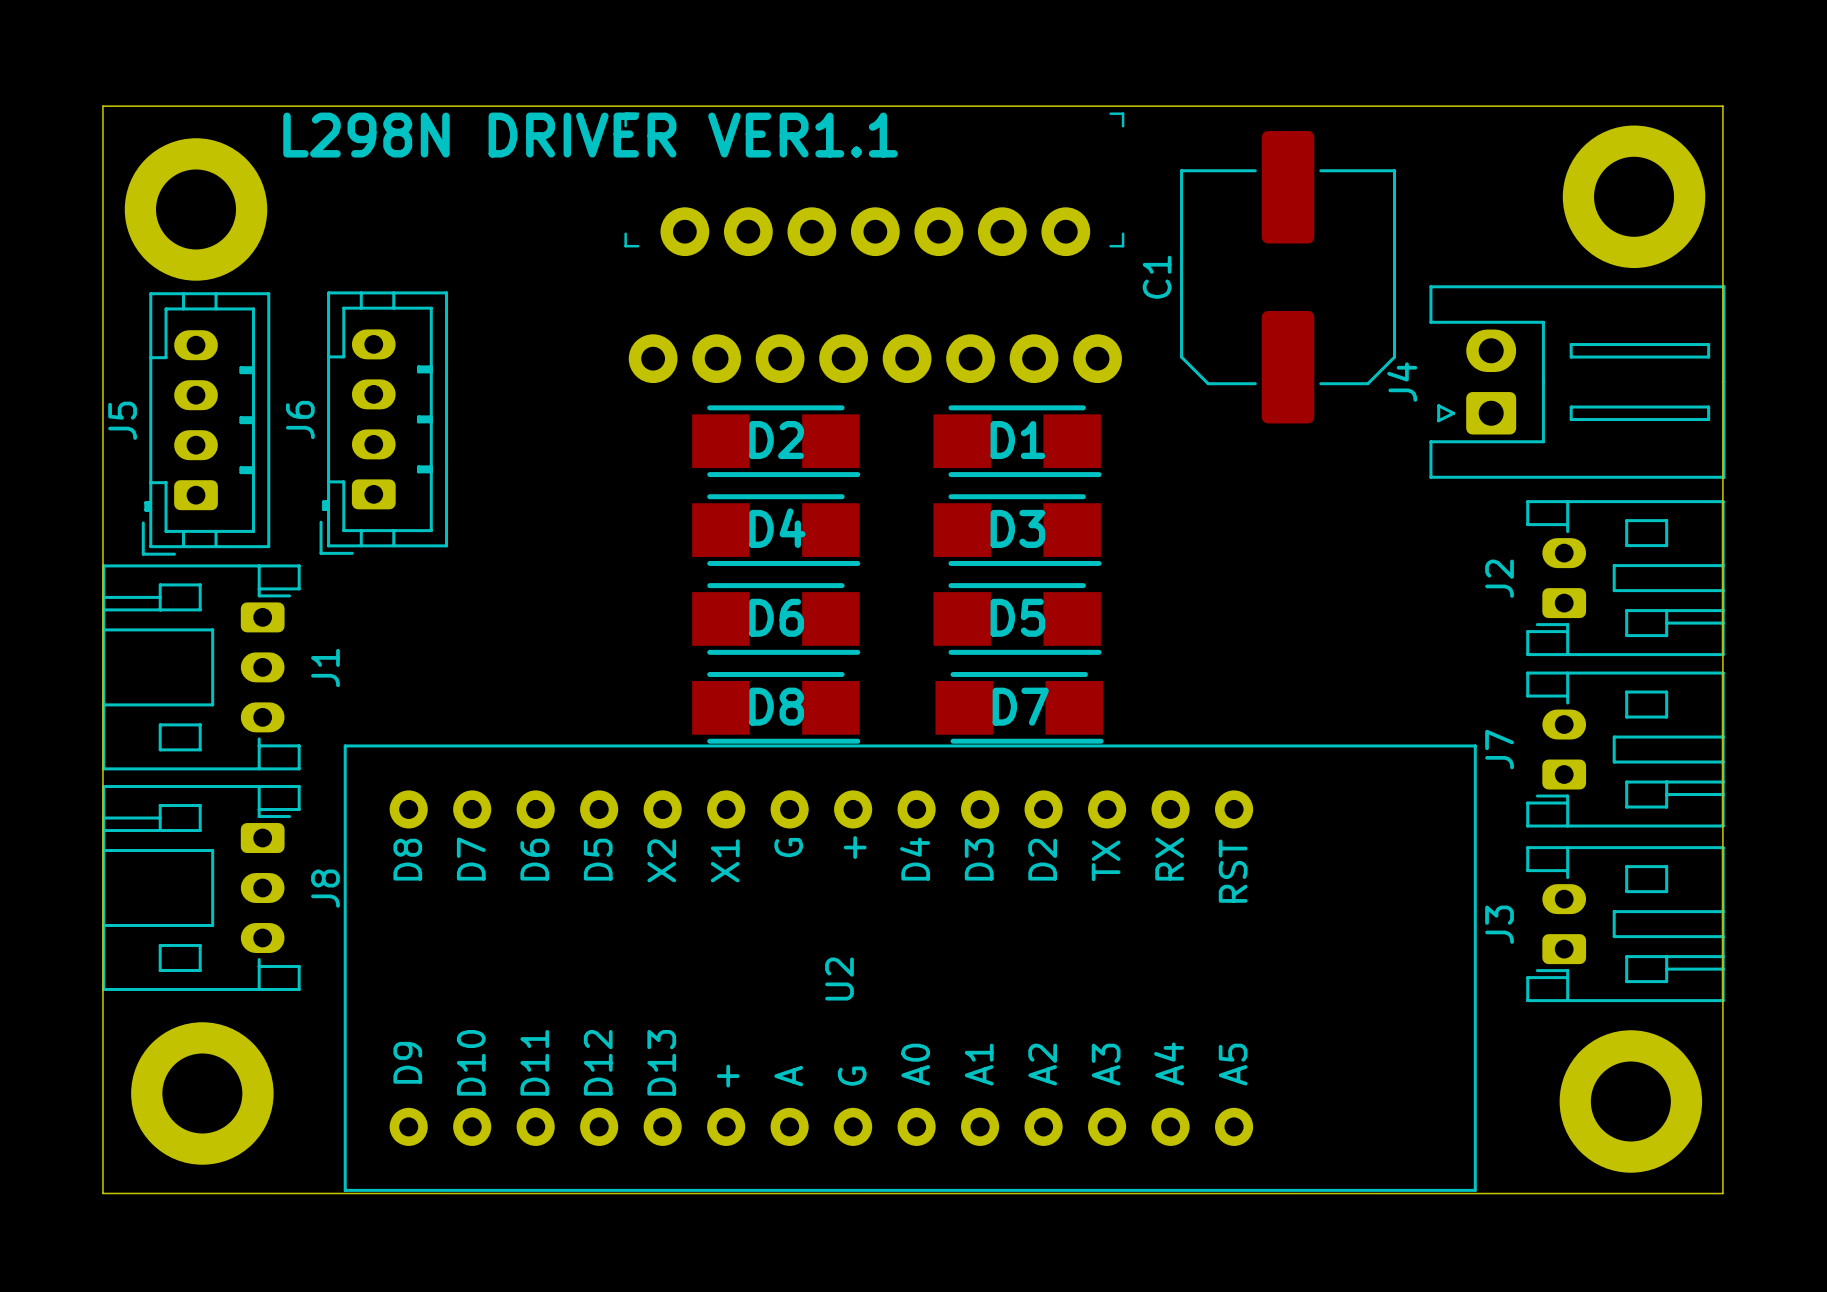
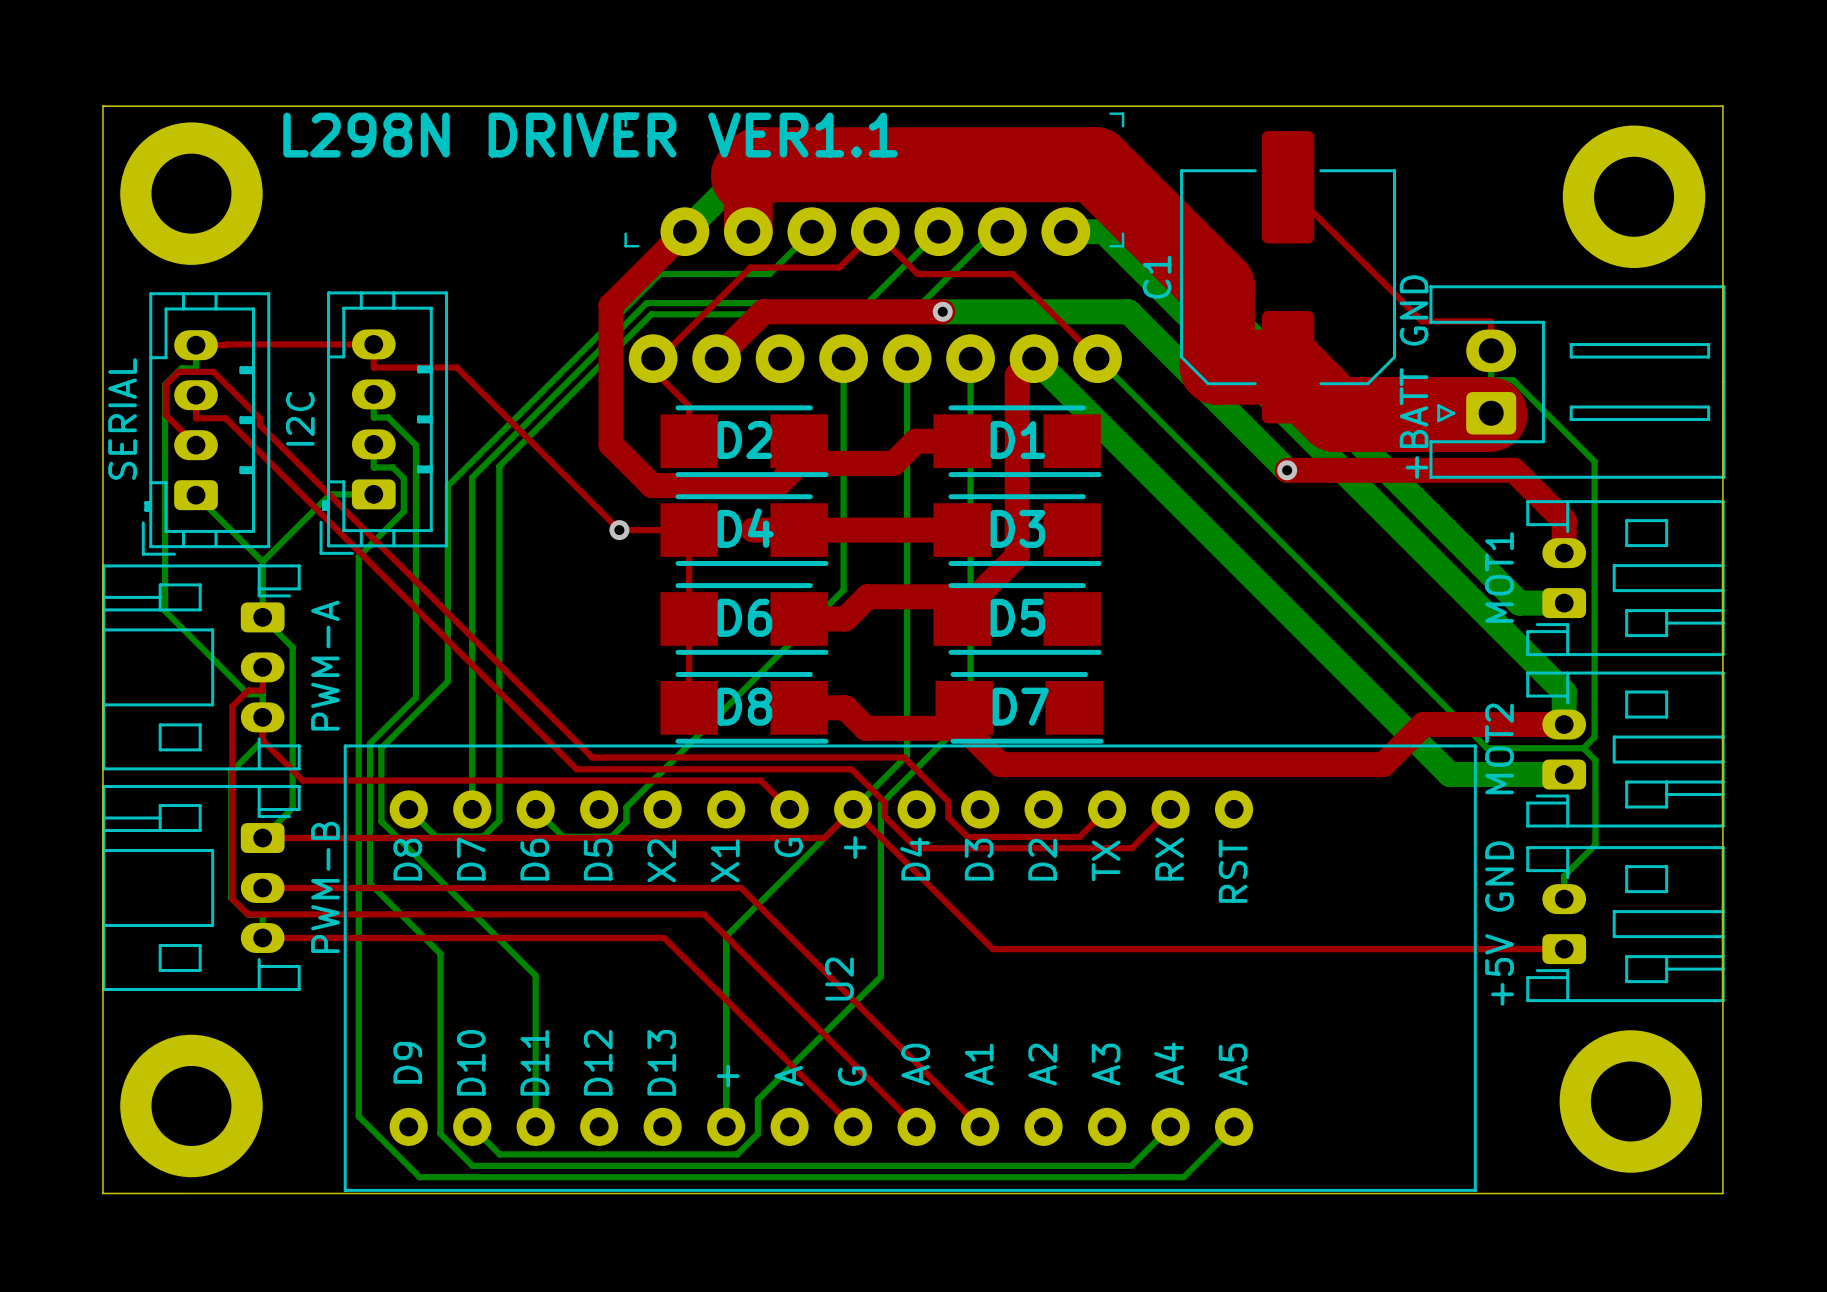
top track: none -> (1288, 187) (1422, 321) (1491, 321) (1491, 350)
part position: (196, 209) -> (191, 193)
top track: none -> (684, 231) (611, 305) (611, 444) (652, 485) (776, 485) (799, 463)
bottom track: none -> (684, 231) (727, 189) (1105, 189) (1519, 603) (1564, 603)
top track: none -> (748, 231) (748, 175) (759, 164) (1095, 164) (1217, 286) (1217, 367) (1288, 367) (1335, 414) (1491, 413)
bottom track: none -> (811, 231) (769, 274) (659, 274) (447, 486) (447, 681) (381, 748) (381, 821) (535, 975) (535, 1126)
bottom track: none -> (938, 231) (867, 303) (646, 303) (472, 477) (472, 809)
bottom track: none -> (1002, 231) (993, 231) (911, 314) (651, 314) (499, 466) (499, 820) (483, 836) (435, 836) (408, 809)
bottom track: none -> (1065, 231) (1103, 231) (1564, 692) (1564, 724)
top track: none -> (942, 311) (763, 311) (716, 358)
bottom track: none -> (942, 311) (1128, 311) (1287, 470)
via: none -> (942, 311)
top track: none -> (196, 345) (373, 344) (373, 367) (456, 367) (619, 530) (689, 530) (689, 707)
bottom track: none -> (196, 345) (196, 368) (181, 368) (165, 384) (165, 611) (248, 694) (262, 694) (262, 740) (231, 771) (231, 897) (248, 914) (262, 914) (262, 937)
bottom track: none -> (1491, 350) (1491, 380) (1513, 380) (1594, 461) (1594, 737) (1583, 748)
top track: none -> (659, 358) (659, 376) (689, 406) (689, 441)
top track: none -> (659, 358) (750, 267) (839, 267) (875, 231) (917, 274) (1012, 274) (1097, 358)
bottom track: none -> (843, 358) (843, 590) (626, 807) (626, 821) (611, 836) (563, 836) (535, 809)
bottom track: none -> (907, 358) (907, 755) (726, 936) (726, 1126)
bottom track: none -> (970, 358) (970, 714) (880, 804) (880, 976) (757, 1099) (757, 1133) (737, 1154) (499, 1154) (472, 1126)
top track: none -> (1034, 358) (1017, 375) (1017, 556) (976, 596) (867, 596) (845, 618) (799, 618)
bottom track: none -> (1034, 358) (1449, 774) (1564, 774)
bottom track: none -> (1097, 358) (1487, 748) (1583, 748)
J4 name: J4 (1402, 382) -> +BATT GND (1414, 377)
bottom track: none -> (373, 394) (373, 417) (388, 417) (415, 445) (415, 697) (370, 743) (370, 883) (440, 953) (440, 1133) (472, 1165) (1131, 1165) (1170, 1126)
top track: none -> (196, 395) (196, 418) (225, 418) (576, 769) (851, 769) (884, 802) (884, 816) (916, 848) (1131, 848) (1170, 809)
J6 name: J6 (300, 419) -> I2C (300, 418)
J5 name: J5 (122, 420) -> SERIAL (122, 418)
D2 position: (776, 441) -> (744, 441)
top track: none -> (962, 441) (915, 441) (893, 463) (799, 463)
bottom track: none -> (373, 444) (373, 467) (393, 467) (403, 478) (403, 511) (358, 556) (358, 1116) (419, 1177) (1183, 1177) (1234, 1126)
top track: none -> (196, 445) (165, 414) (165, 384) (178, 371) (213, 371) (259, 418) (259, 425) (592, 757) (904, 757) (948, 801) (948, 817) (967, 836) (1079, 836) (1107, 809)
top track: none -> (1287, 470) (1513, 470) (1564, 520) (1564, 553)
via: none -> (1287, 470)
bottom track: none -> (373, 494) (330, 494) (262, 561)
bottom track: none -> (196, 495) (262, 561)
via: none -> (619, 530)
top track: none -> (752, 530) (962, 530)
D4 position: (776, 530) -> (744, 530)
bottom track: none -> (262, 561) (262, 617) (292, 647) (292, 807) (262, 838)
J2 name: J2 (1499, 578) -> MOT1 (1499, 577)
D6 position: (776, 618) -> (744, 618)
top track: none -> (262, 667) (262, 690) (248, 690) (232, 706) (232, 898) (247, 914) (704, 914) (916, 1126)
J1 name: J1 (325, 667) -> PWM-A (325, 665)
D8 position: (776, 707) -> (744, 707)
top track: none -> (799, 707) (845, 707) (865, 728) (964, 728)
top track: none -> (262, 717) (262, 740) (302, 780) (760, 780) (789, 809)
top track: none -> (1564, 724) (1423, 724) (1383, 764) (1000, 764) (964, 728)
bottom track: none -> (1583, 748) (1595, 760) (1595, 844) (1564, 876) (1564, 899)
J7 name: J7 (1499, 749) -> MOT2 (1499, 748)
top track: none -> (262, 838) (824, 838) (853, 809) (992, 949) (1564, 949)
top track: none -> (262, 888) (741, 888) (980, 1126)
J8 name: J8 (325, 888) -> PWM-B (325, 887)
J3 name: J3 (1499, 924) -> +5V GND (1499, 923)
top track: none -> (262, 937) (664, 937) (853, 1126)
part position: (202, 1093) -> (191, 1105)

